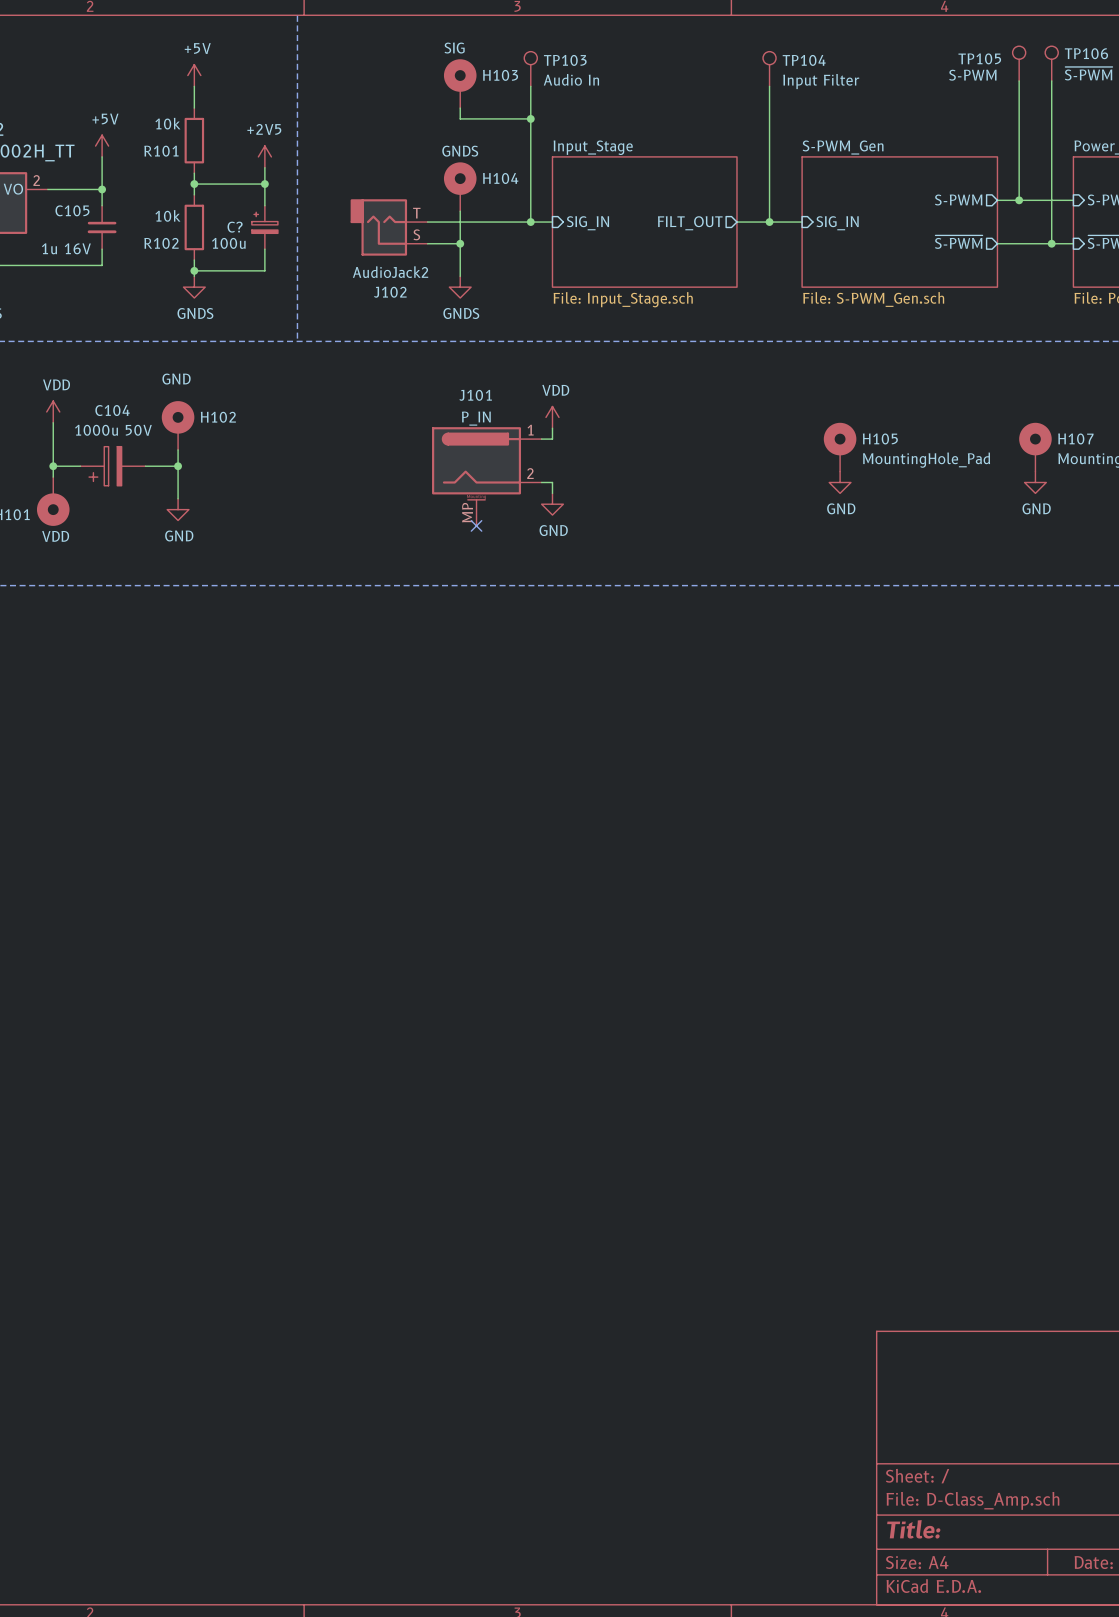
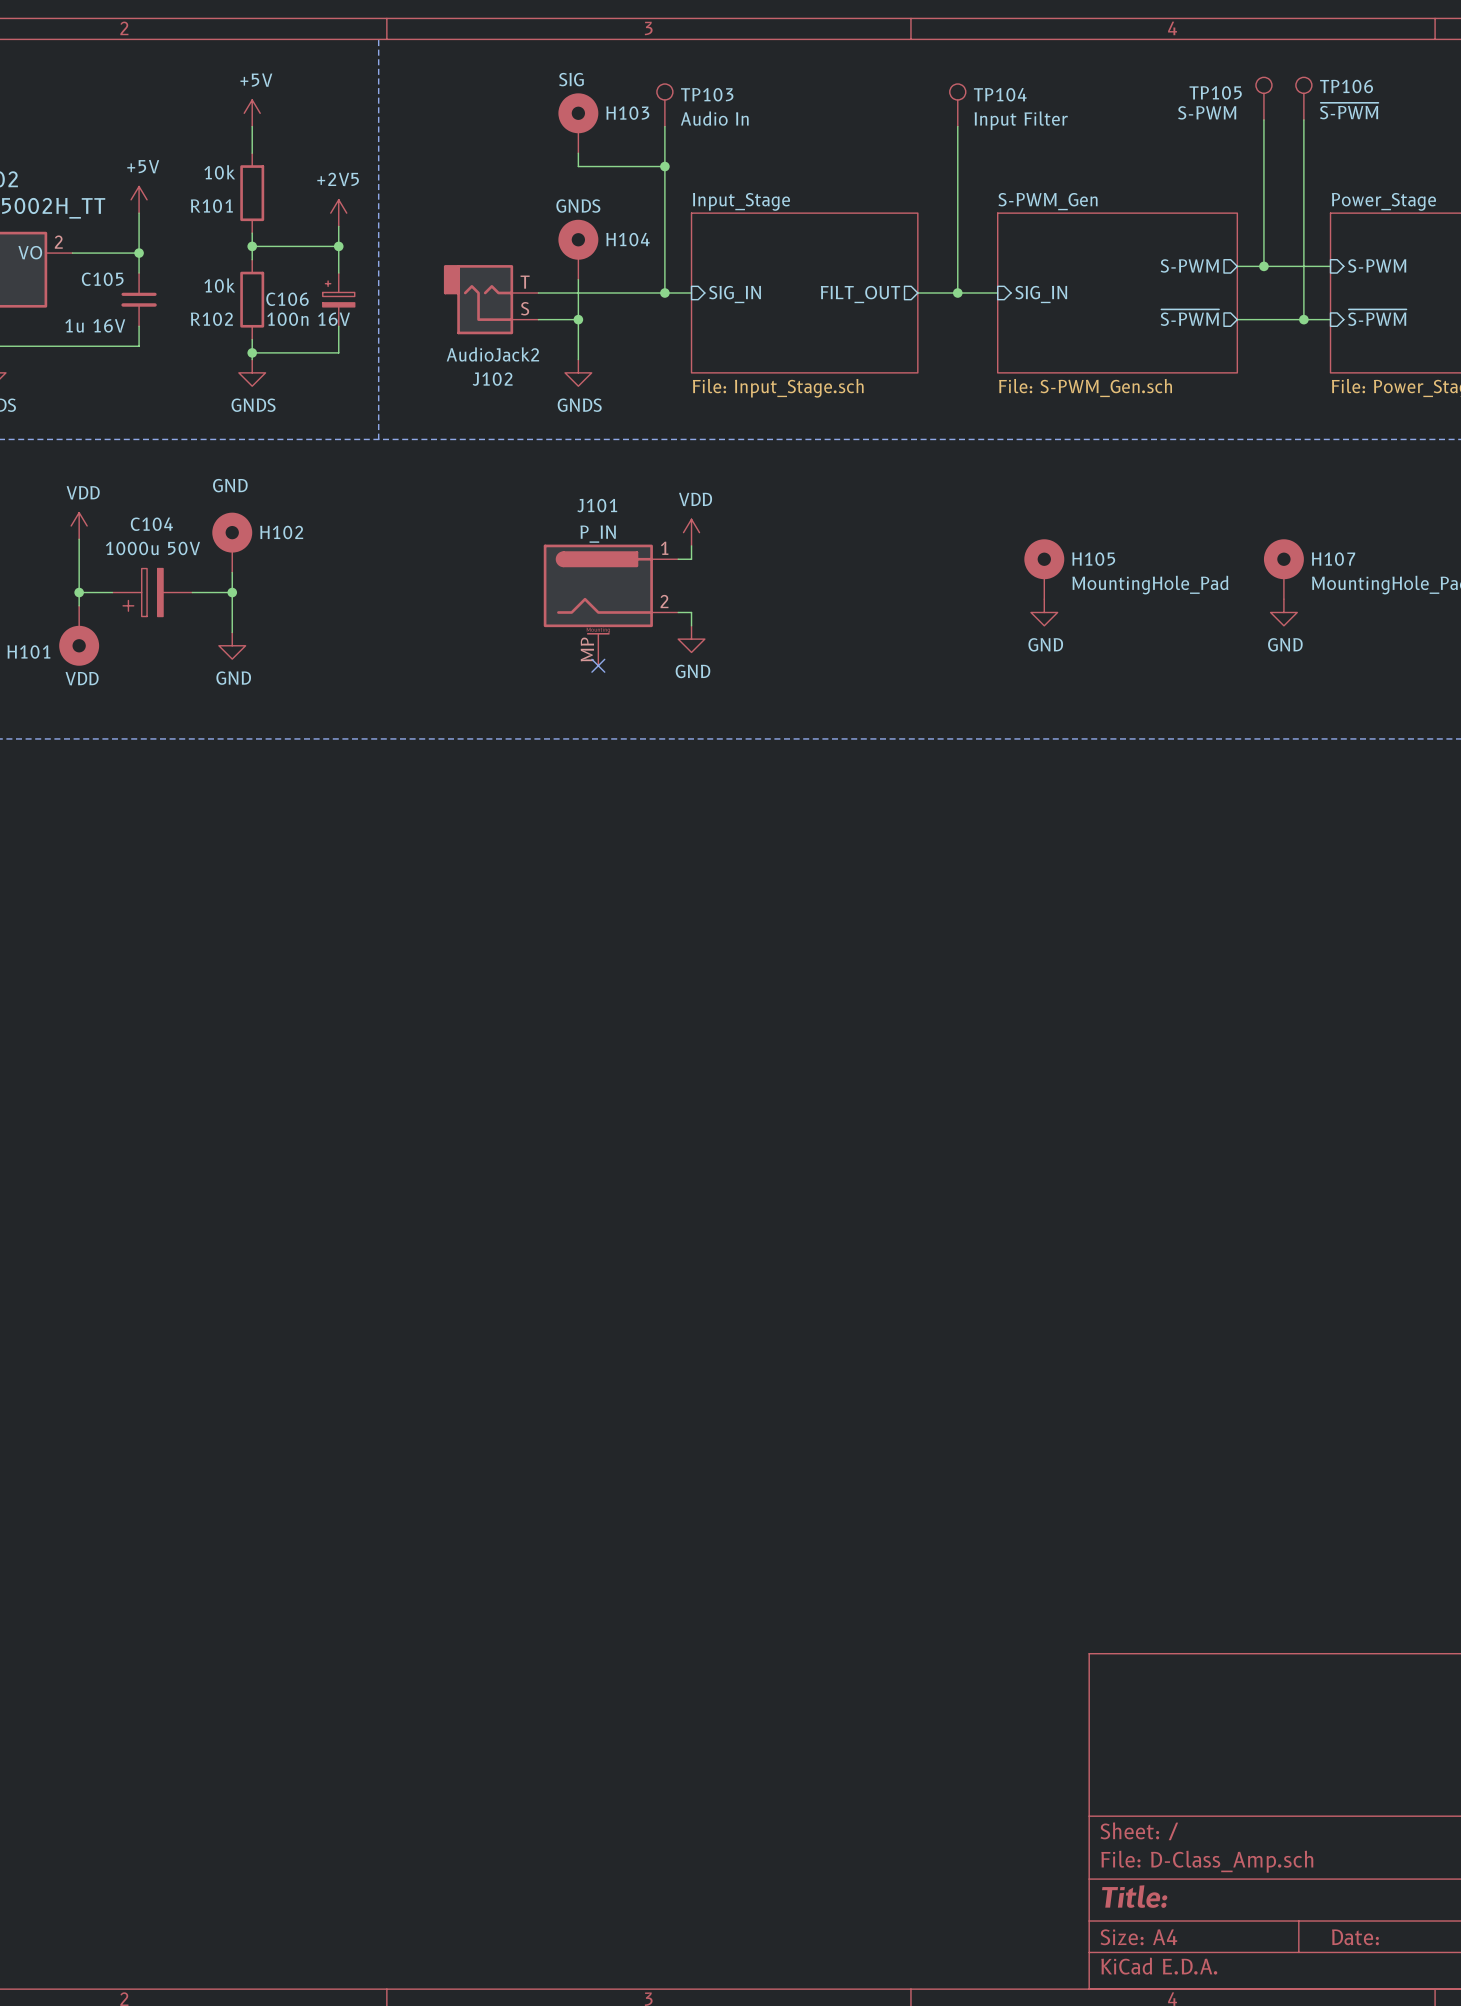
C? name: C? (235, 227) -> C106 (287, 299)
C? value: 100u (228, 243) -> 100n 16V (308, 319)

